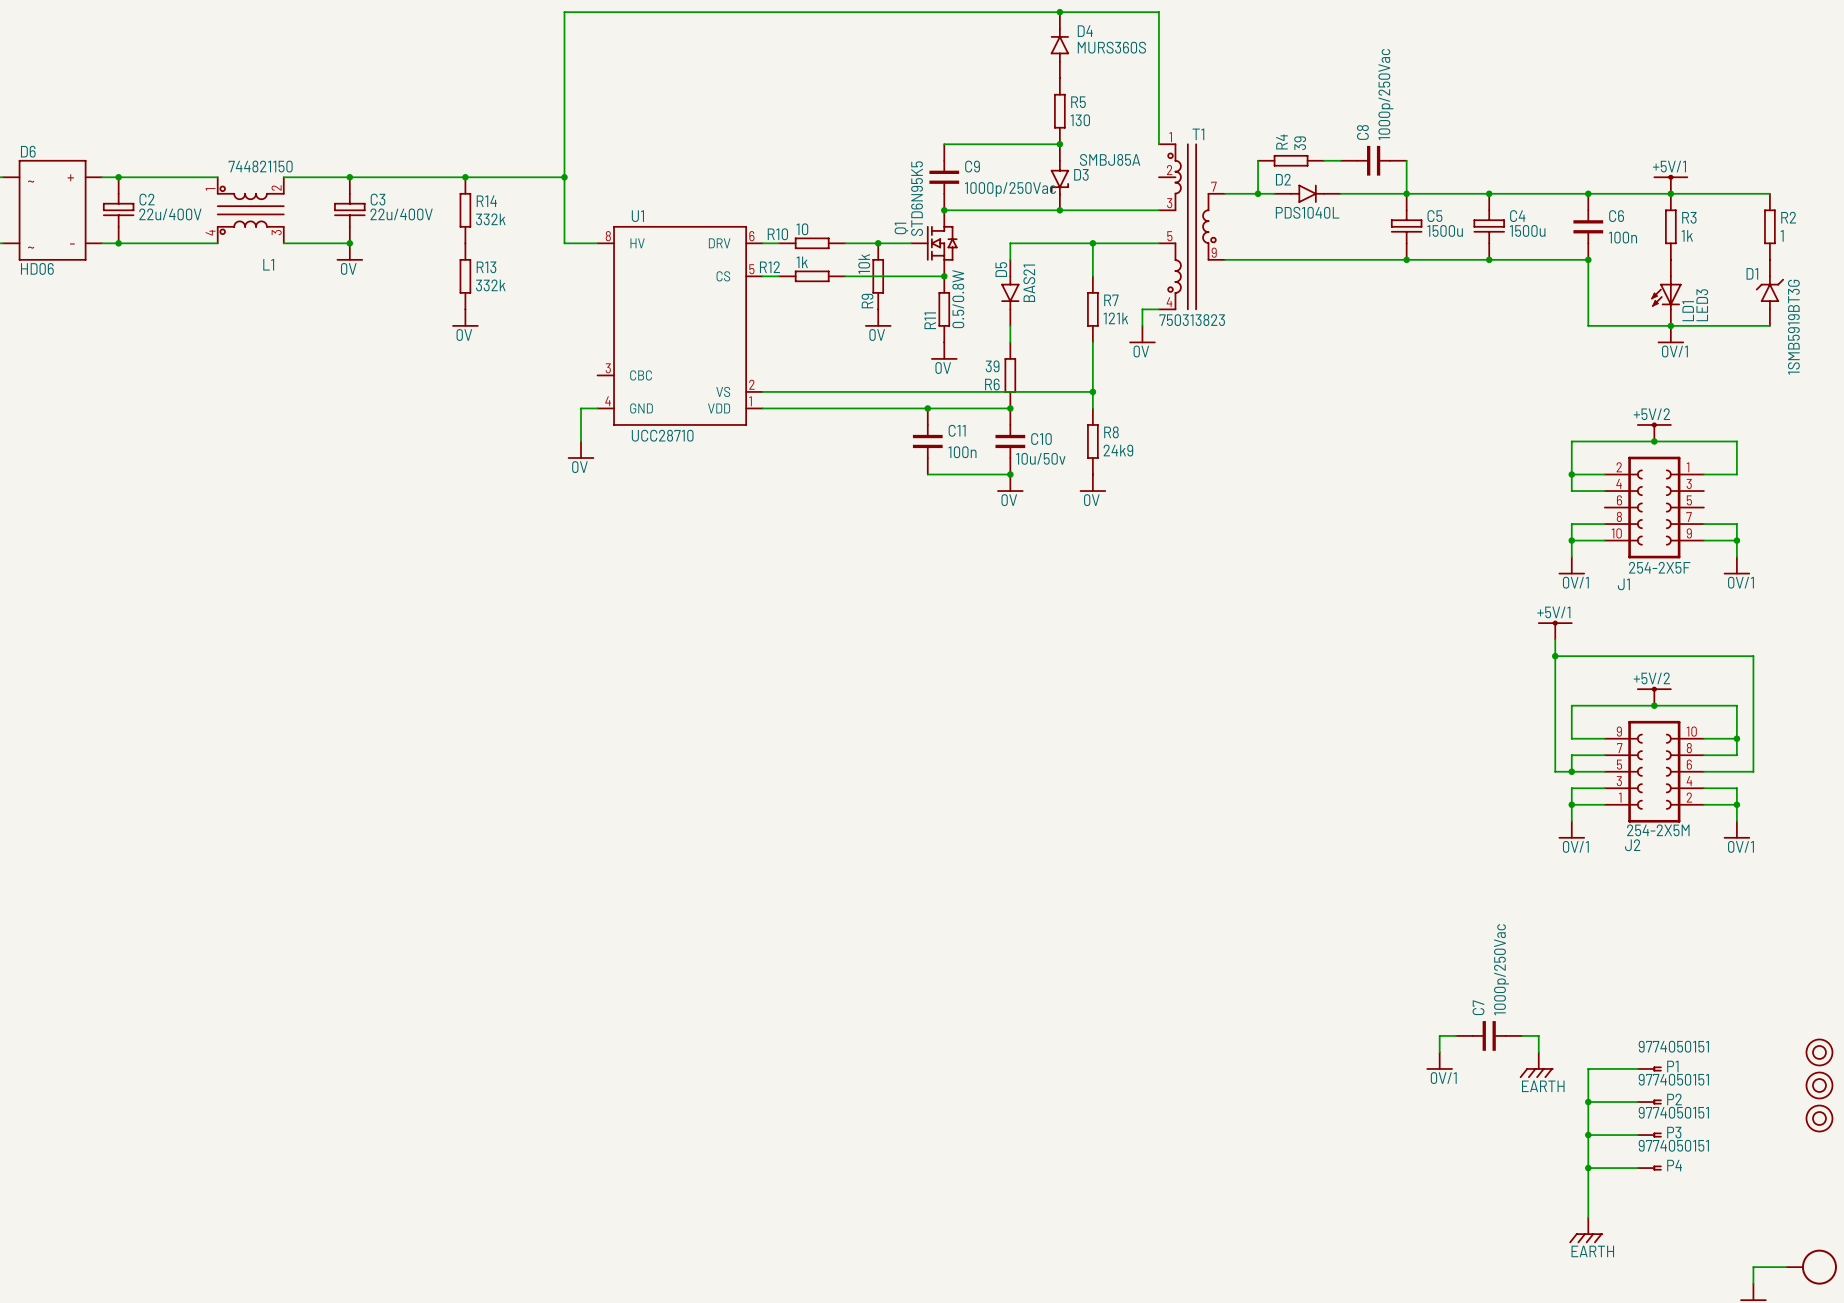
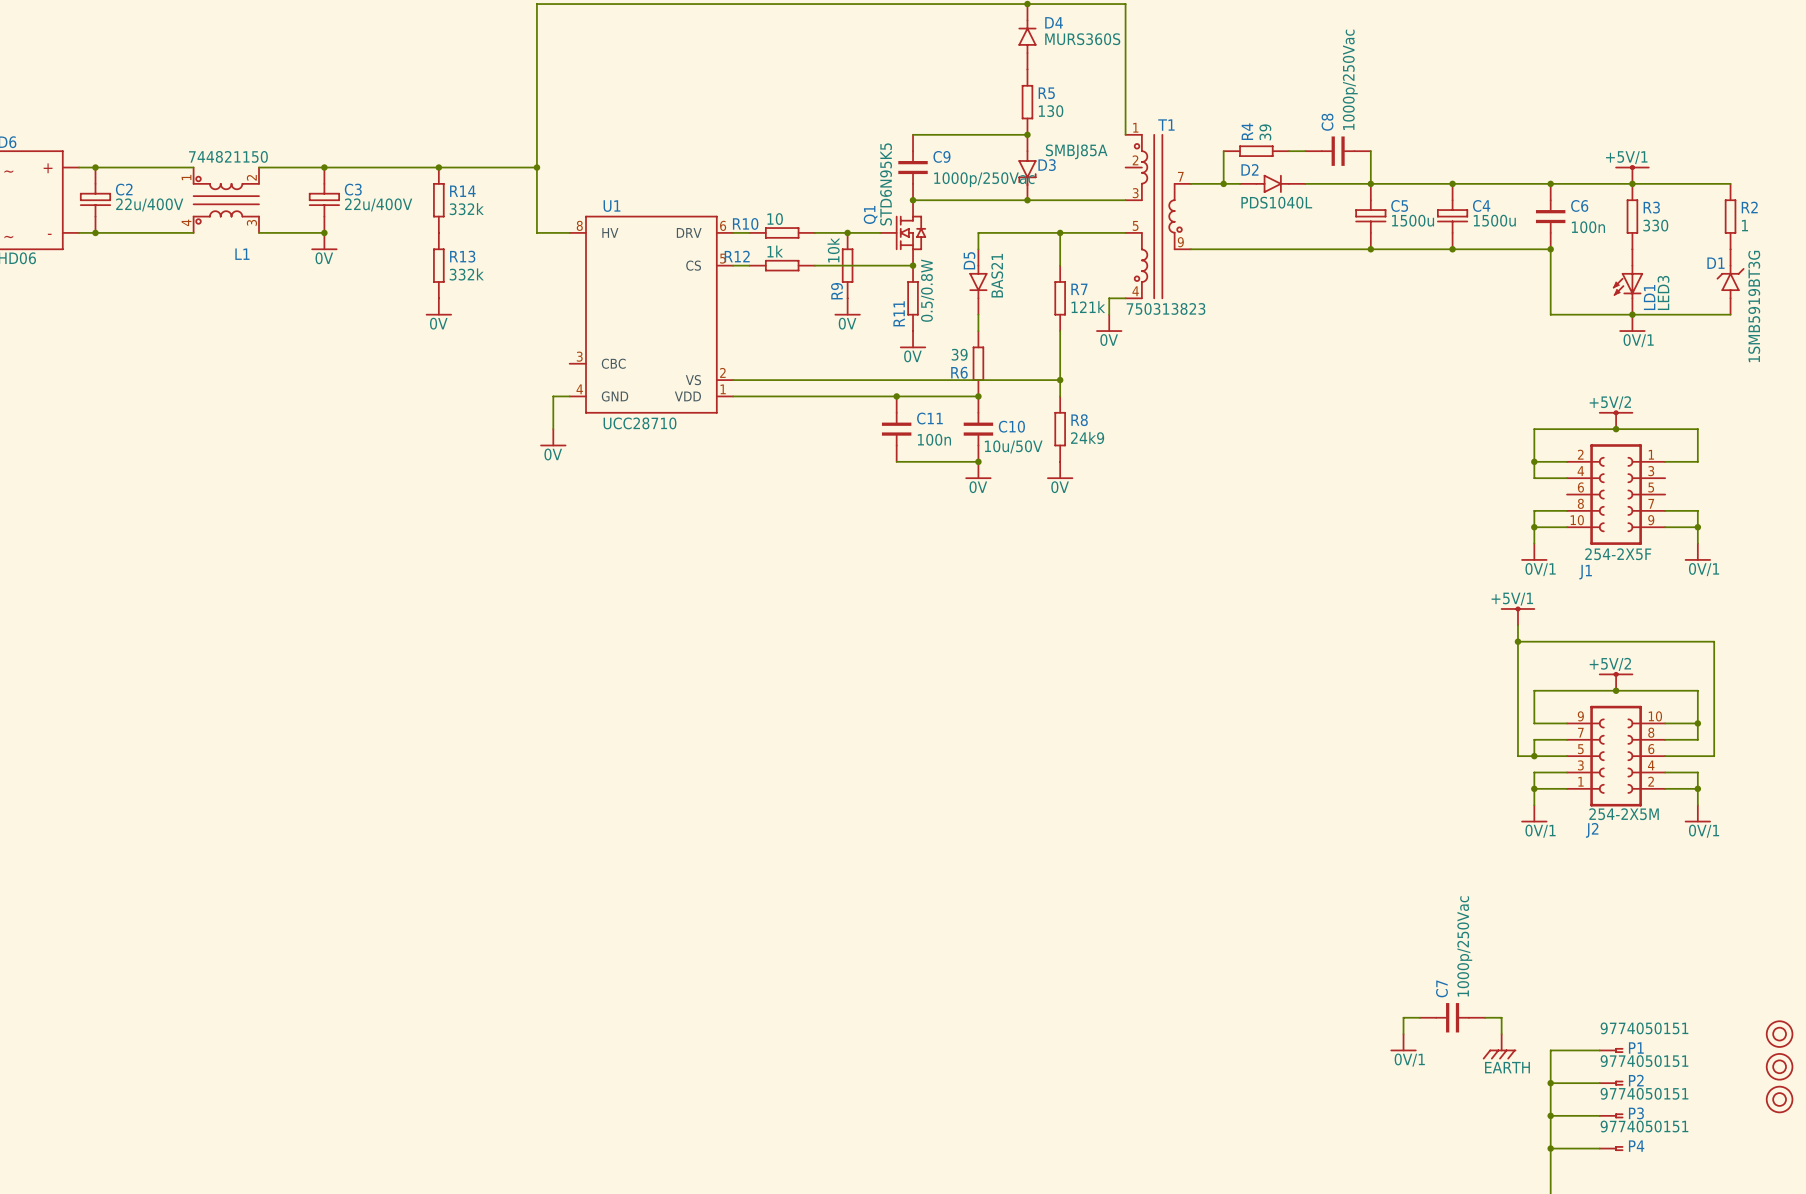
R3 value: 1k (1687, 235) -> 330 (1655, 225)
C10 value: 10u/50v (1040, 458) -> 10u/50V (1013, 446)

